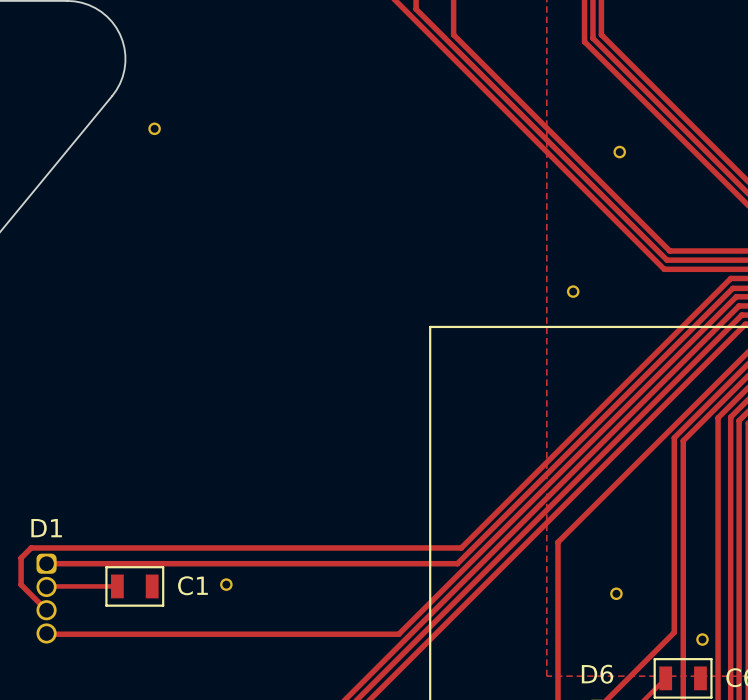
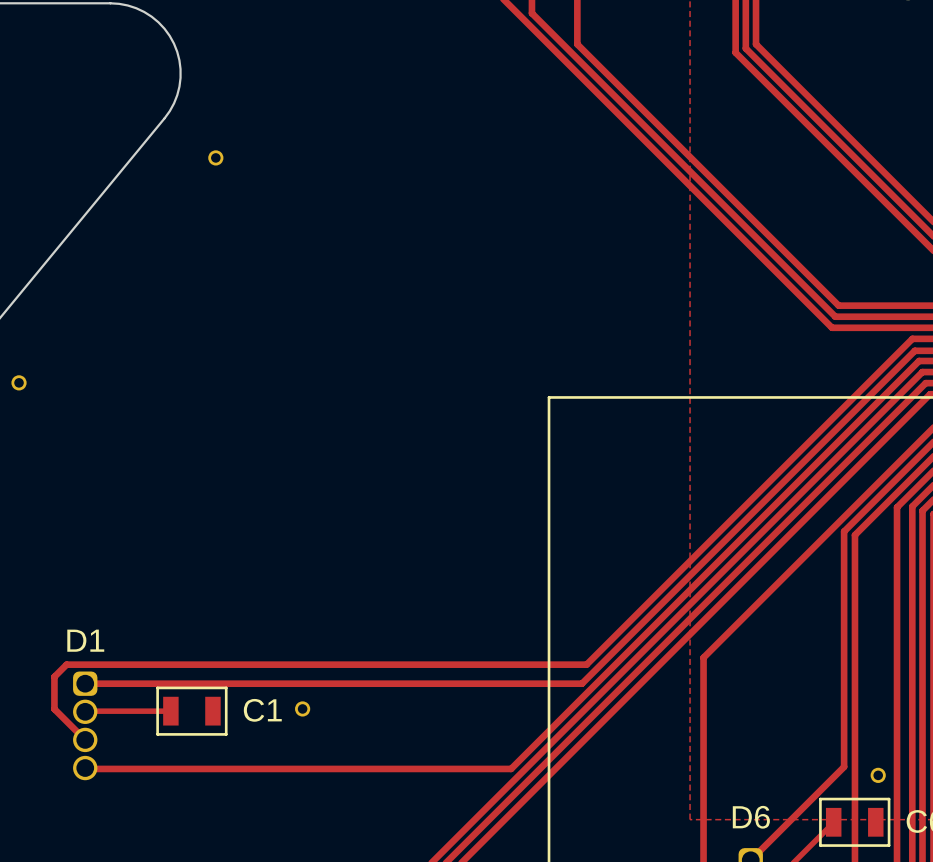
part: (619, 152) -> none
part: (573, 291) -> none
part: (616, 593) -> none

